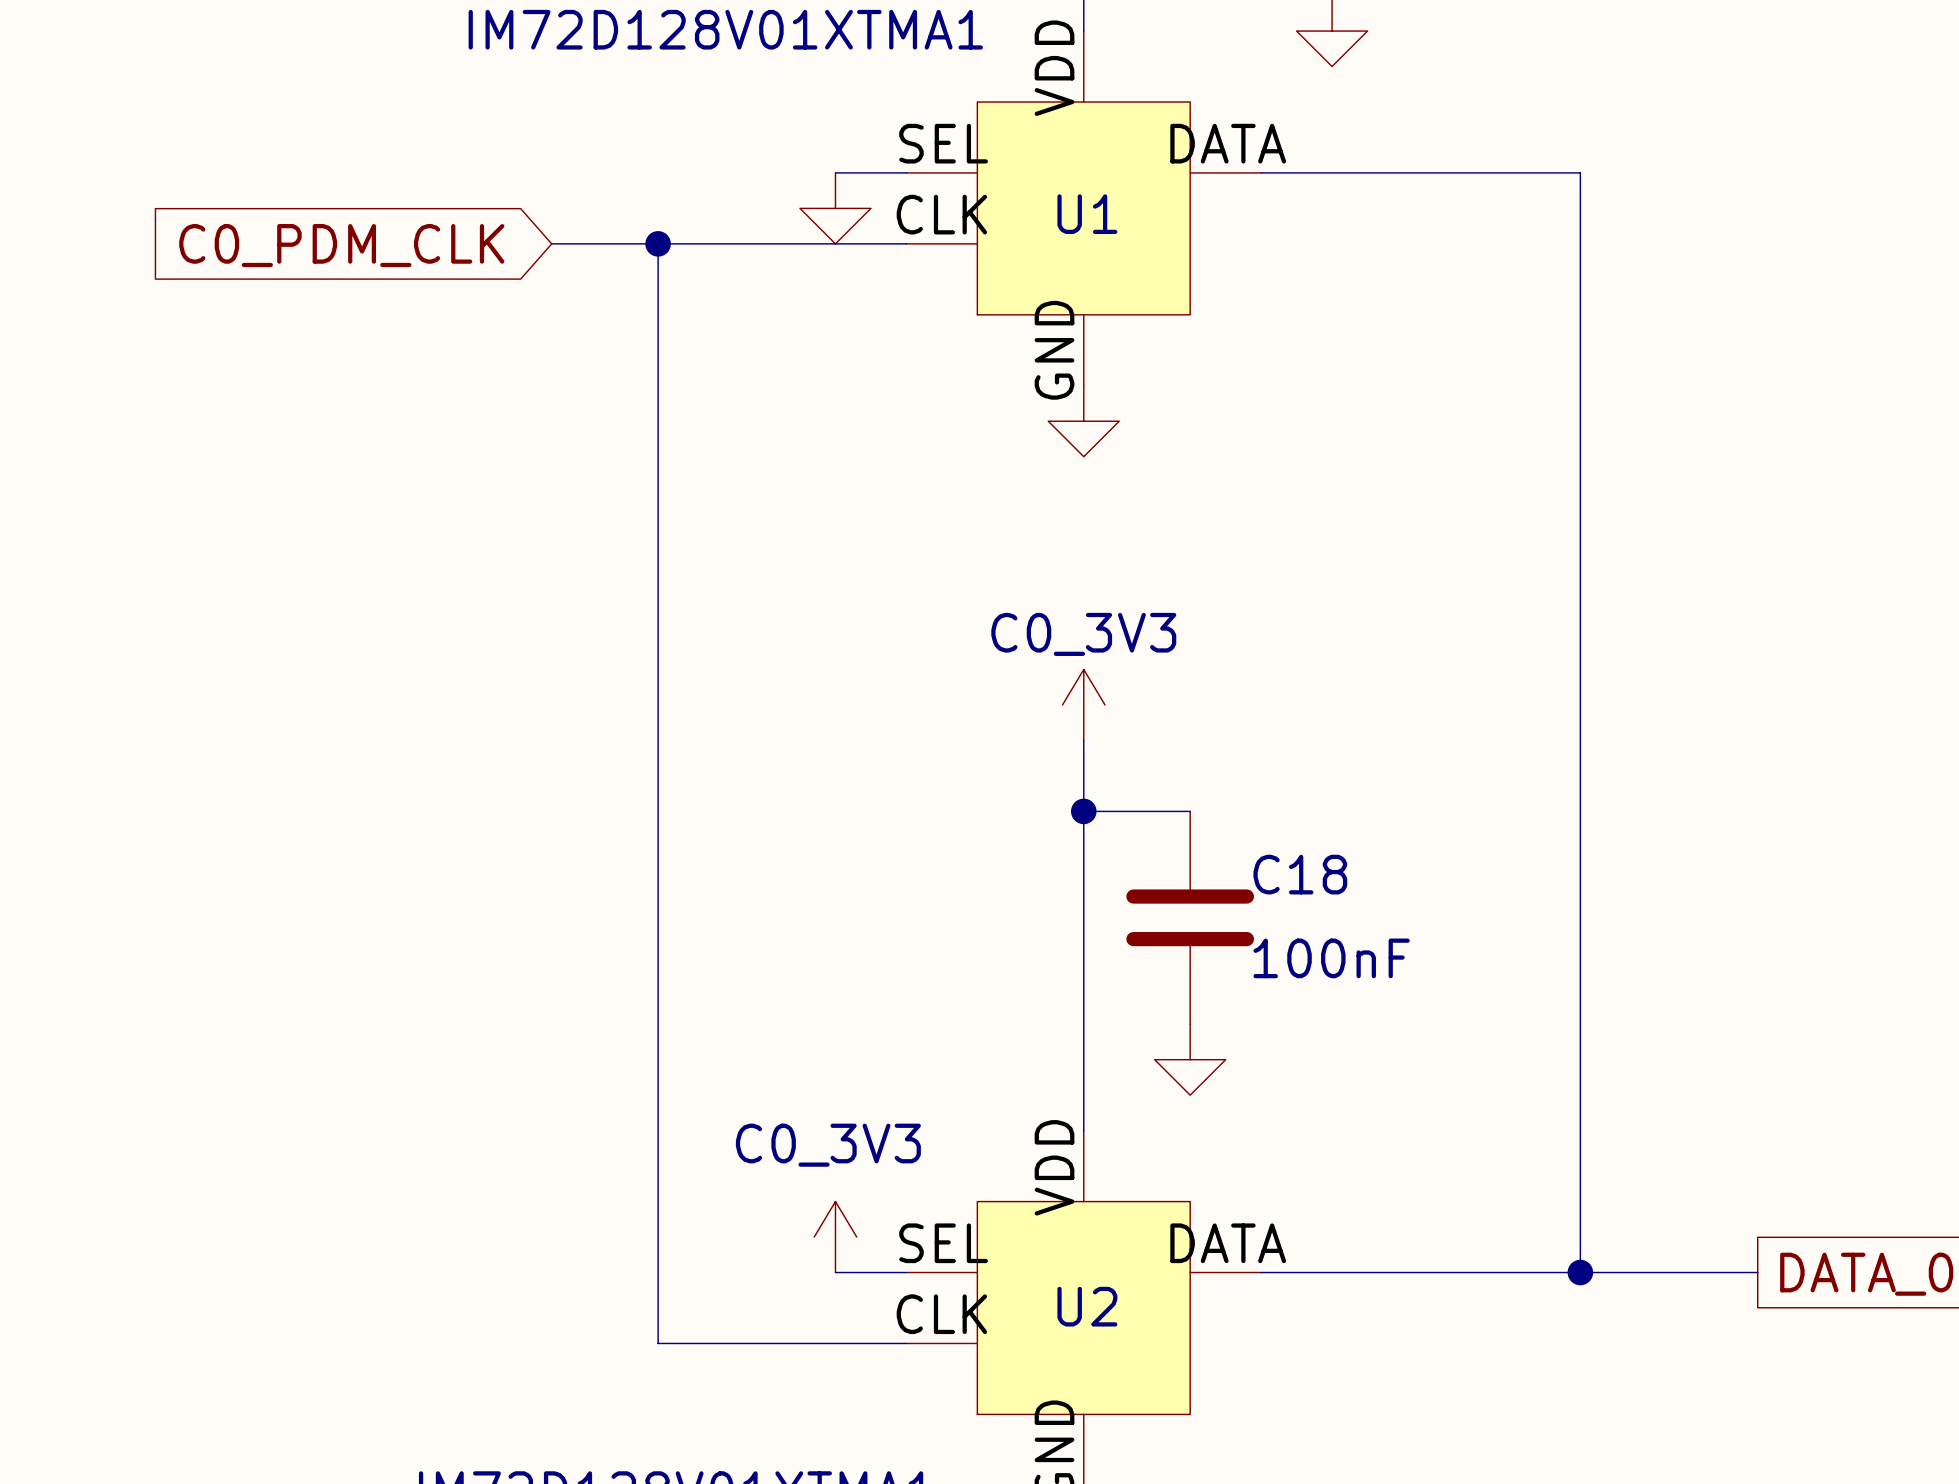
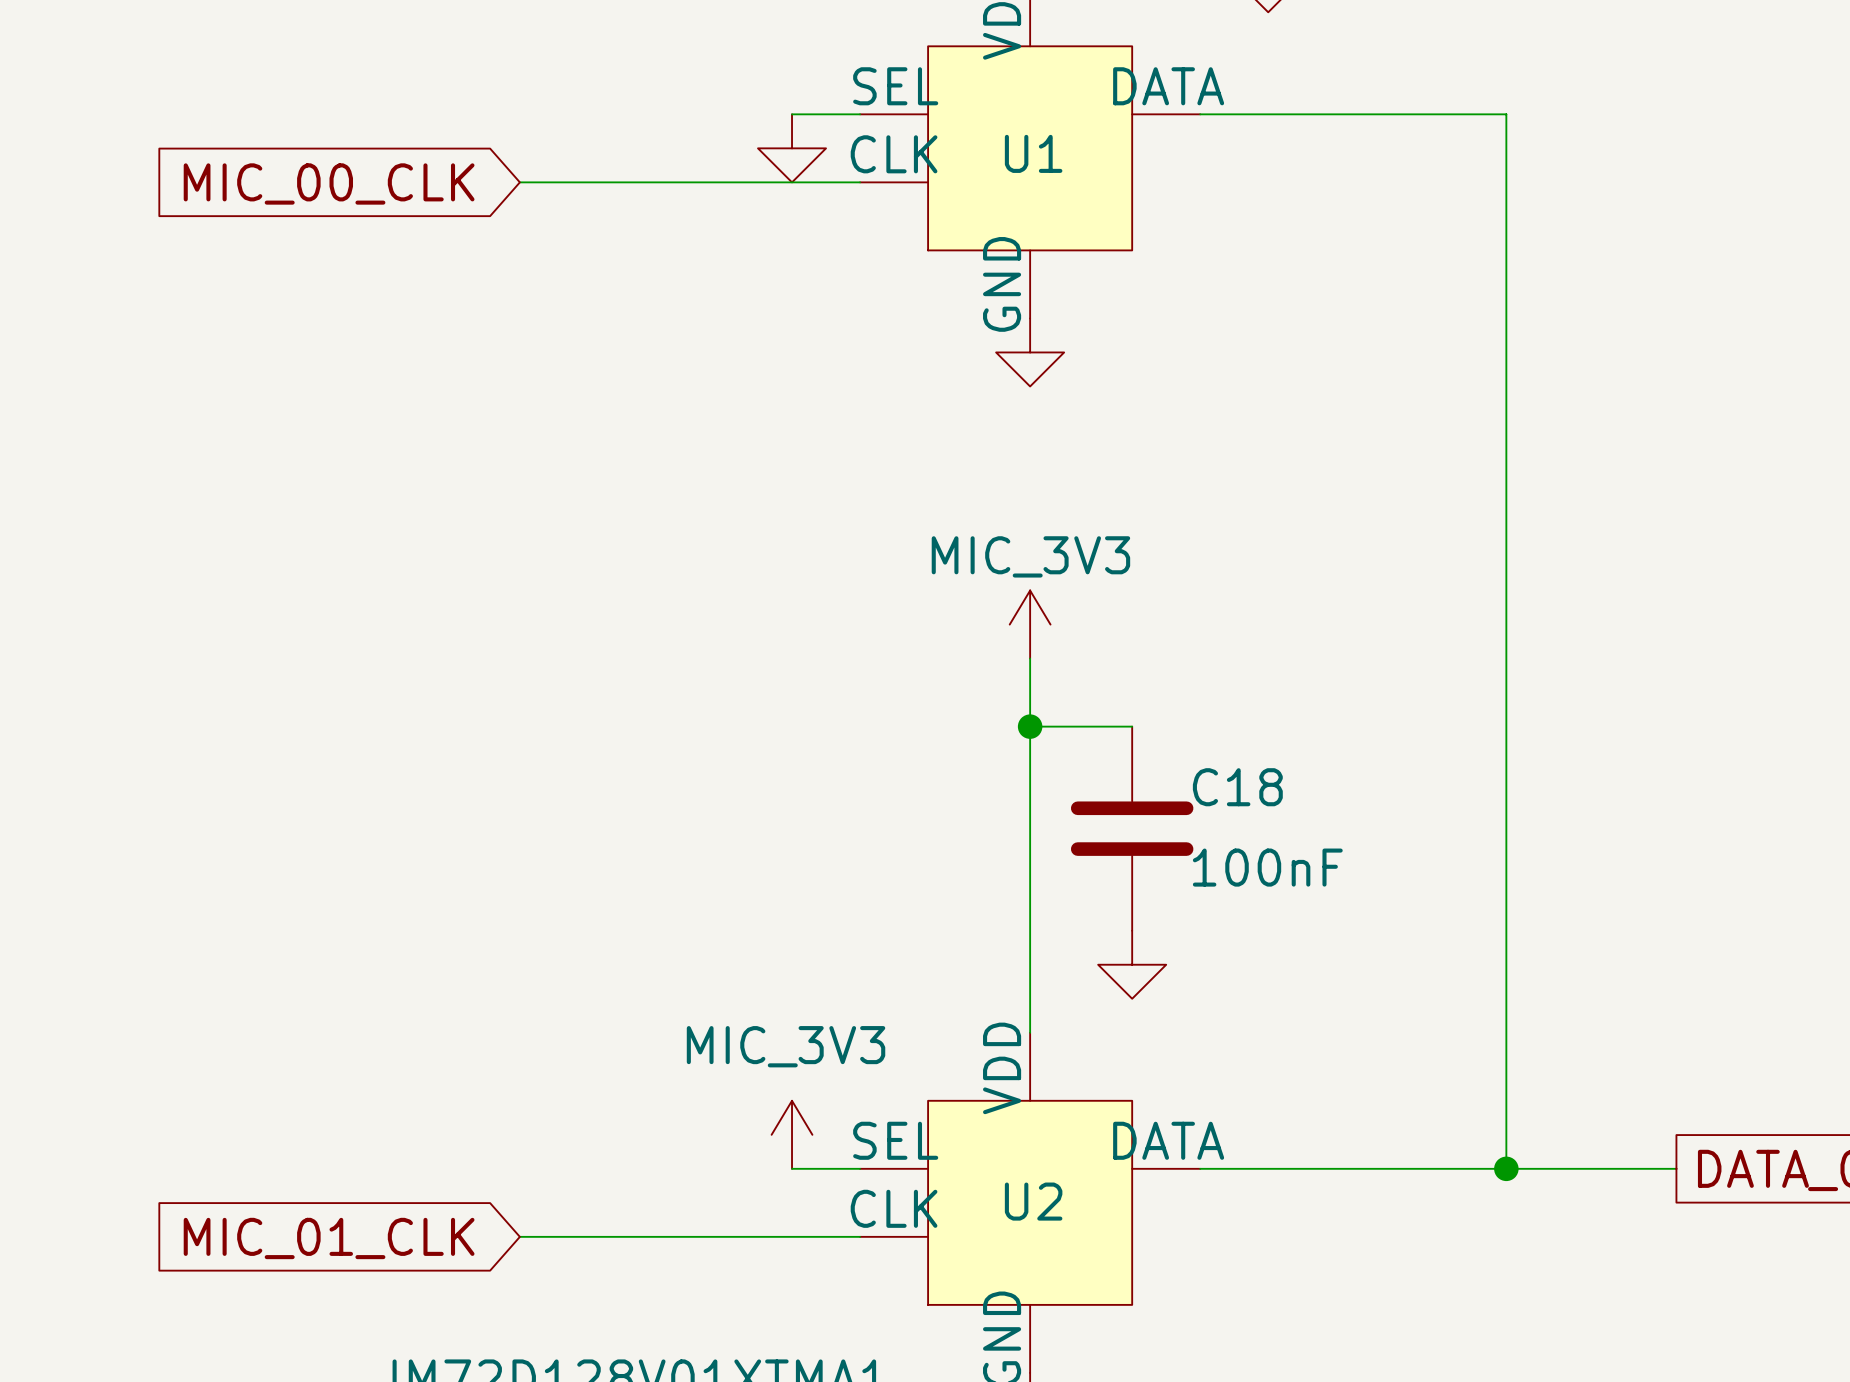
wire: (658, 243) (658, 1343) -> (519, 1236) (621, 1236)
junction: (658, 243) -> none
global label: C0_PDM_CLK (341, 245) -> MIC_00_CLK (329, 183)
power symbol: C0_3V3 (1083, 704) -> MIC_3V3 (1030, 624)
power symbol: C0_3V3 (835, 1237) -> MIC_3V3 (792, 1134)
global label: none -> MIC_01_CLK (329, 1238)

